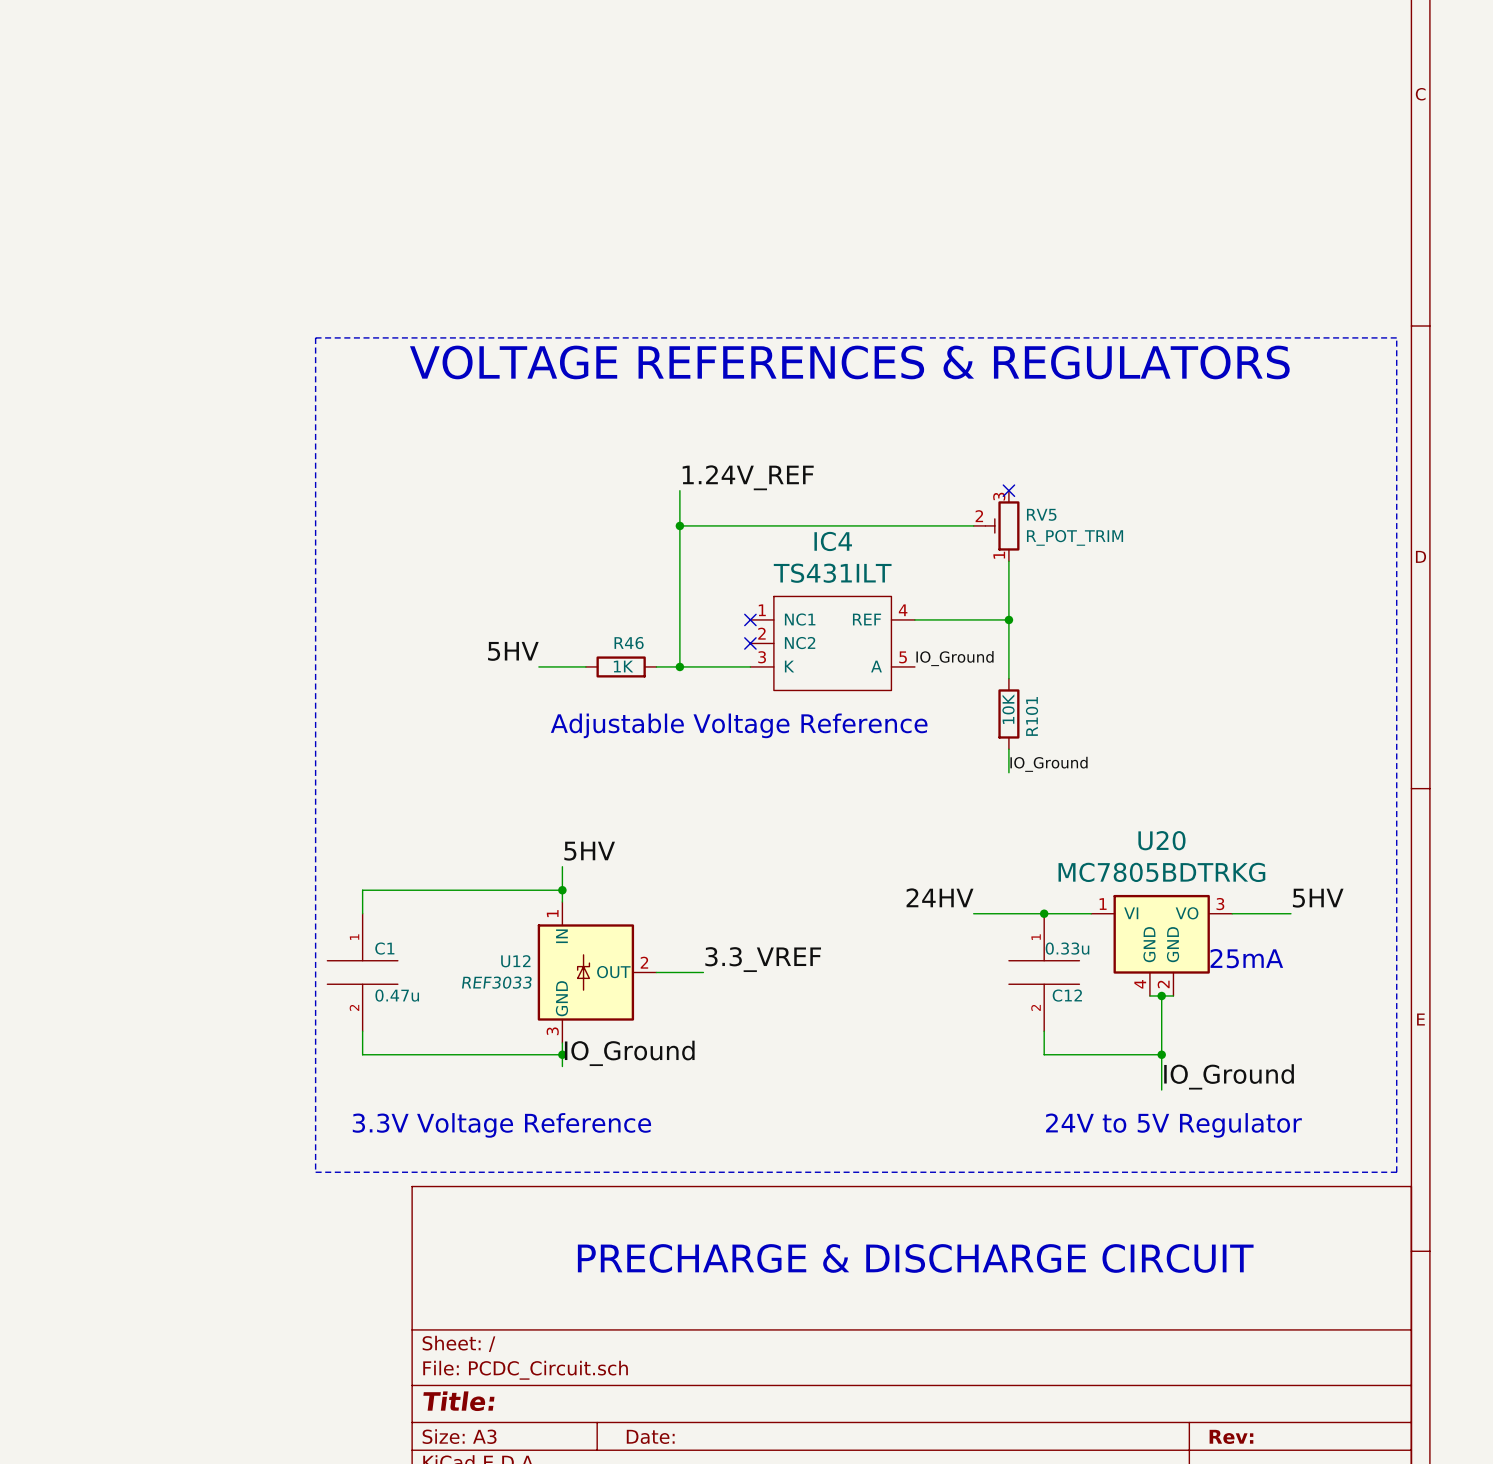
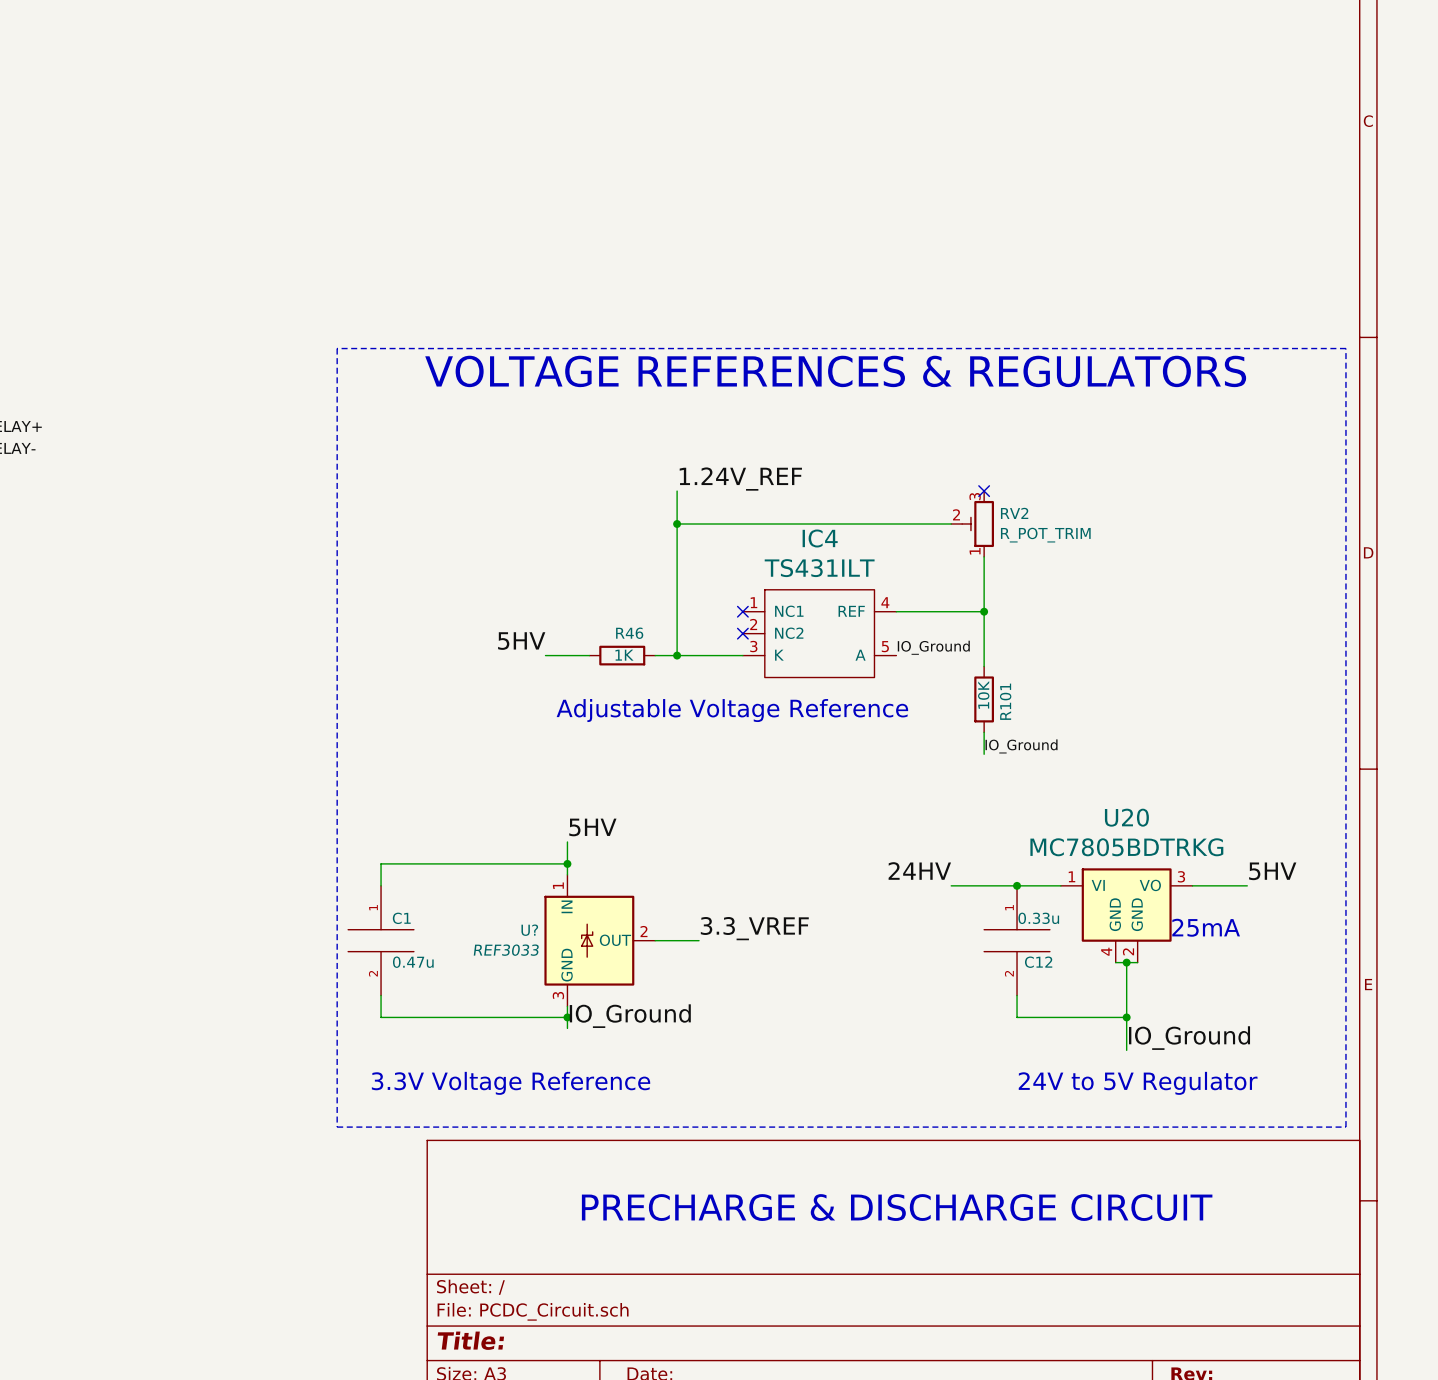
RV5 name: RV5 (1041, 514) -> RV2 (1014, 513)
U12 name: U12 (515, 961) -> U? (529, 930)

